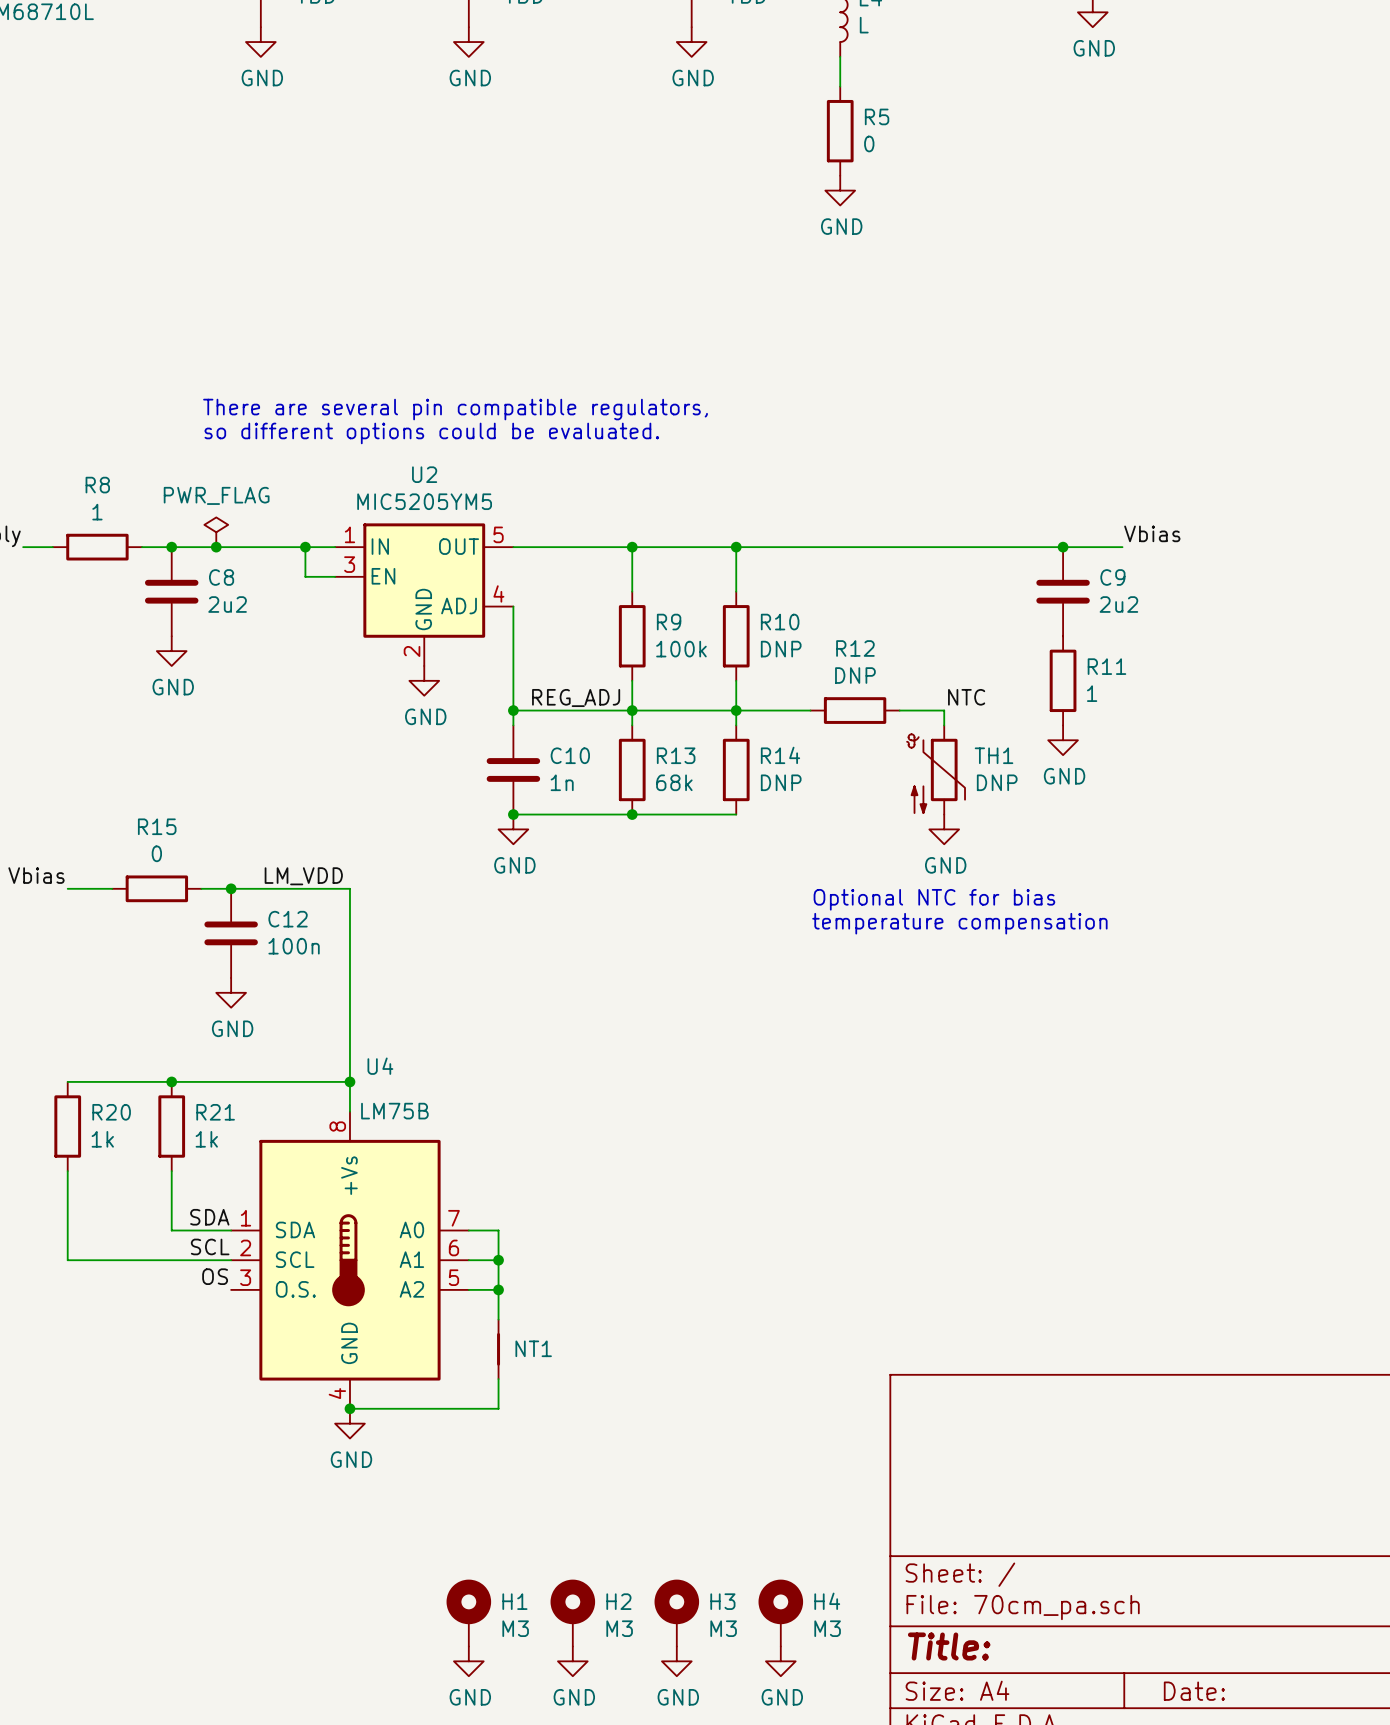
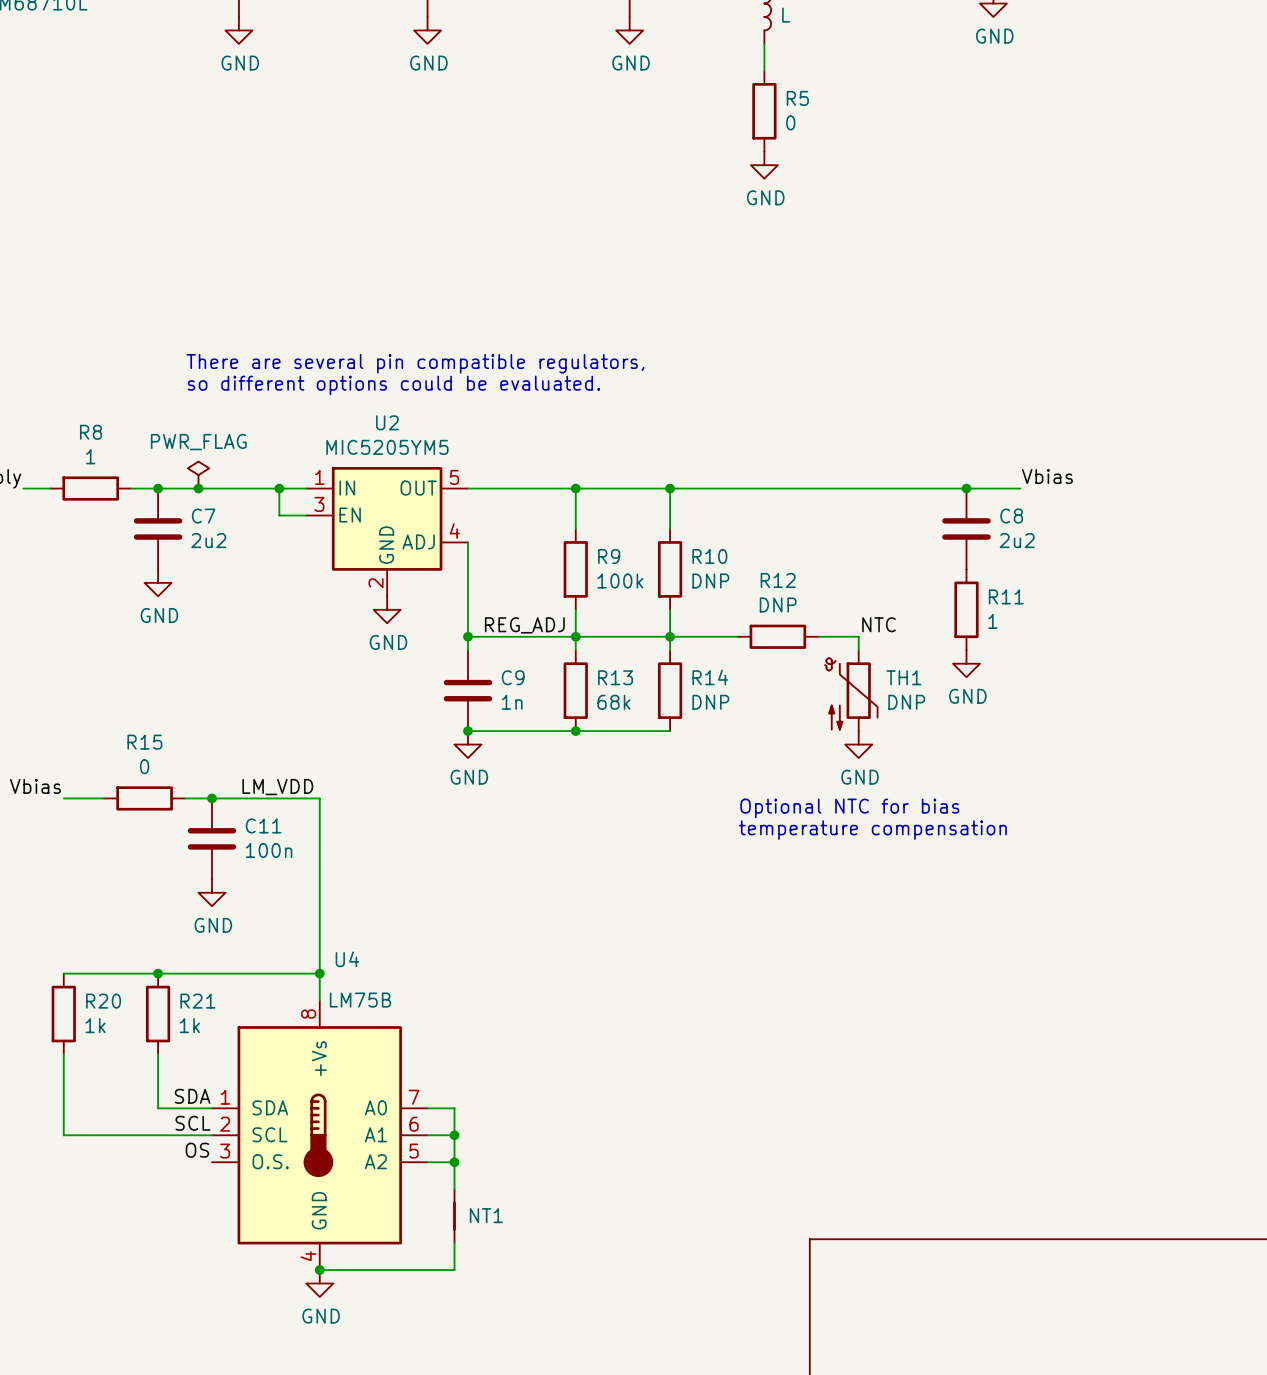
C8 name: C8 (221, 577) -> C7 (203, 516)
C9 name: C9 (1112, 577) -> C8 (1011, 516)
C10 name: C10 (570, 755) -> C9 (513, 677)
C12 name: C12 (288, 919) -> C11 (263, 825)

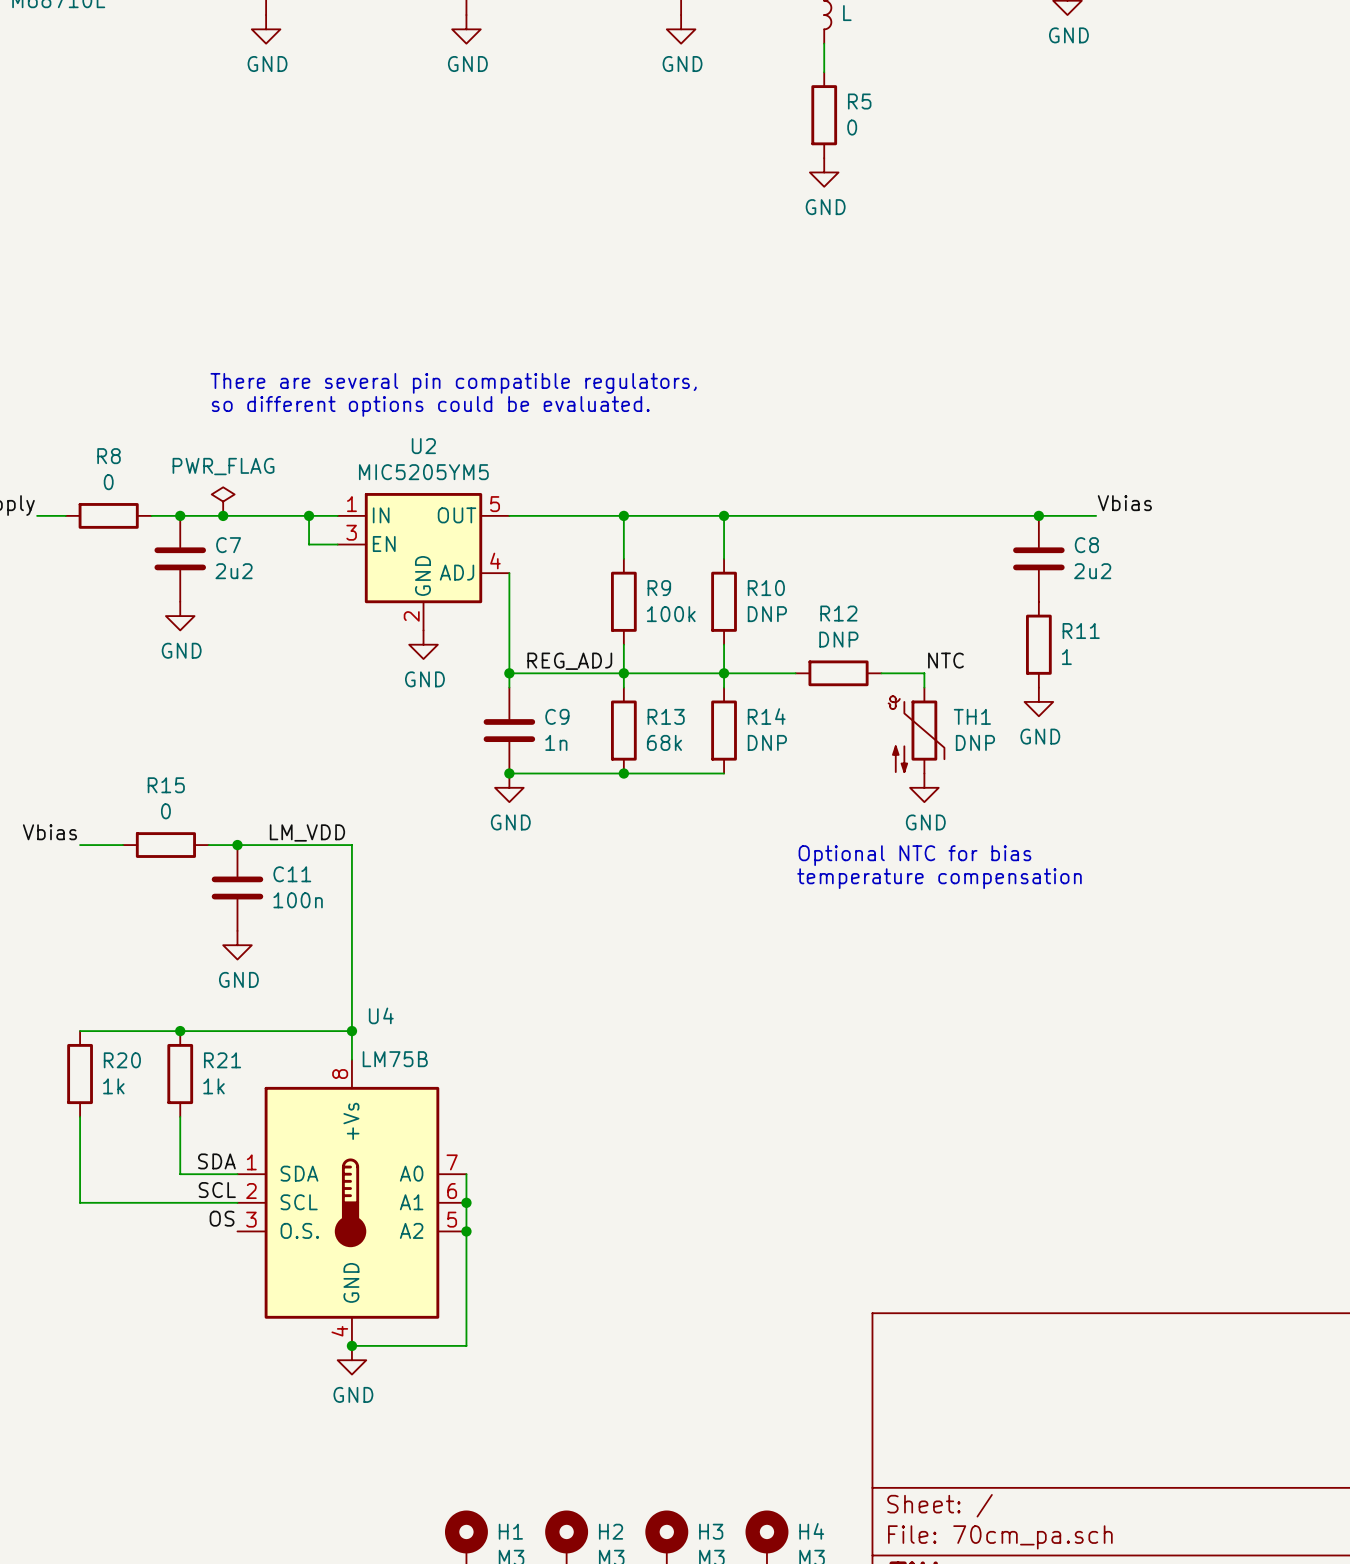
R8 value: 1 (90, 456) -> 0 (108, 482)
wire: (427, 1108) (454, 1108) (454, 1189) -> (466, 1174) (466, 1345)
wire: (427, 1135) (454, 1135) -> none
junction: none -> (466, 1202)
junction: (454, 1135) -> none
wire: (427, 1162) (454, 1162) -> none
junction: none -> (466, 1231)
junction: (454, 1162) -> none
NT1: (454, 1216) -> none
wire: (454, 1243) (454, 1270) (427, 1270) -> none

